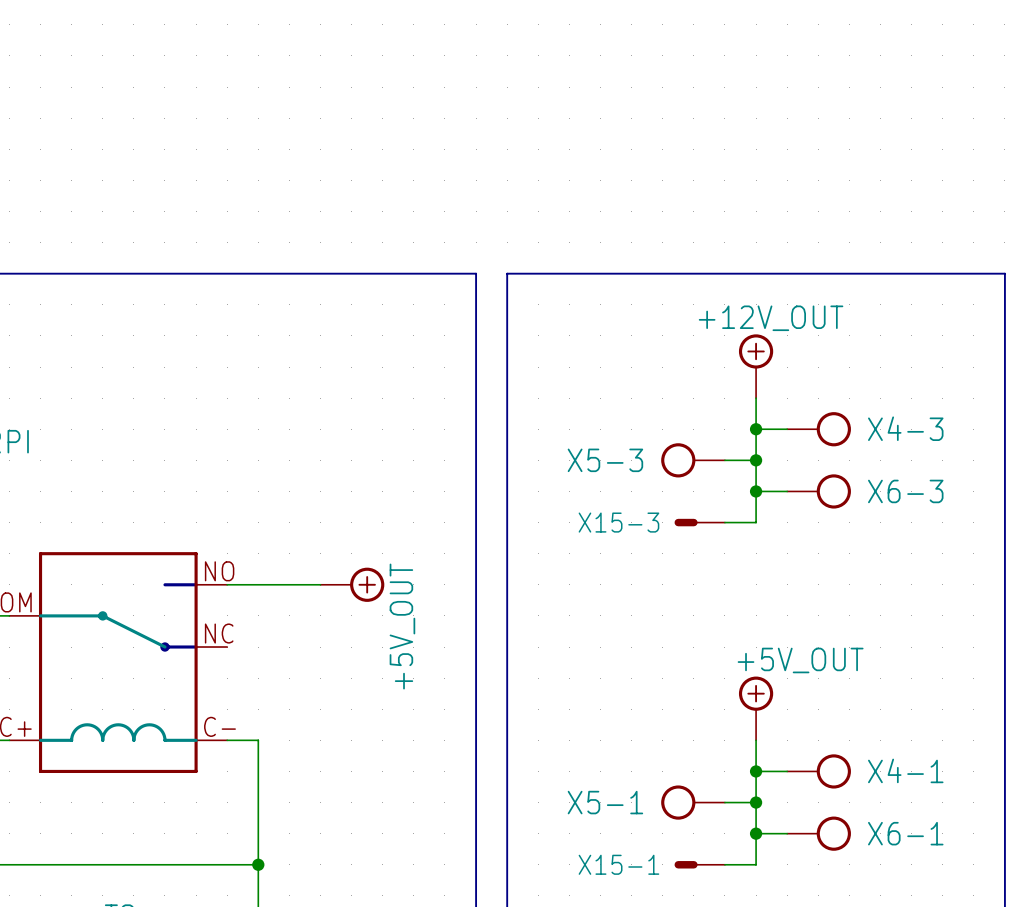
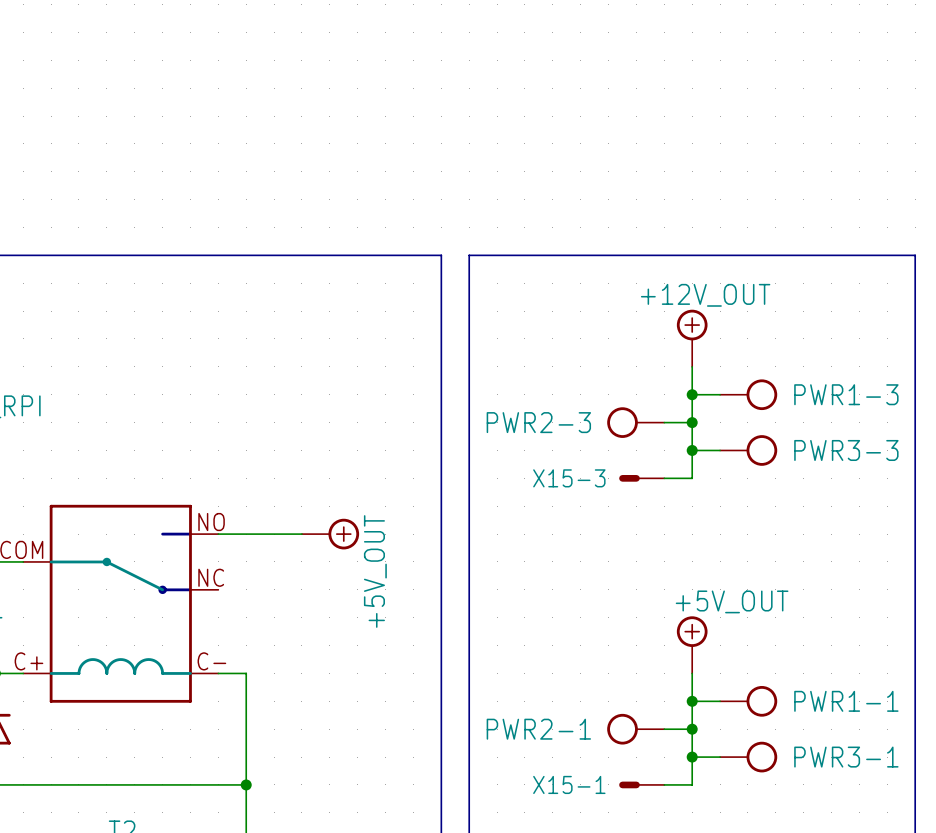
X4-3 name: X4-3 (905, 428) -> PWR1-3 (846, 394)
X5-3 name: X5-3 (605, 460) -> PWR2-3 (538, 422)
X6-3 name: X6-3 (905, 491) -> PWR3-3 (846, 450)
X4-1 name: X4-1 (905, 770) -> PWR1-1 (846, 701)
X5-1 name: X5-1 (605, 802) -> PWR2-1 (538, 729)
X6-1 name: X6-1 (905, 833) -> PWR3-1 (846, 757)

